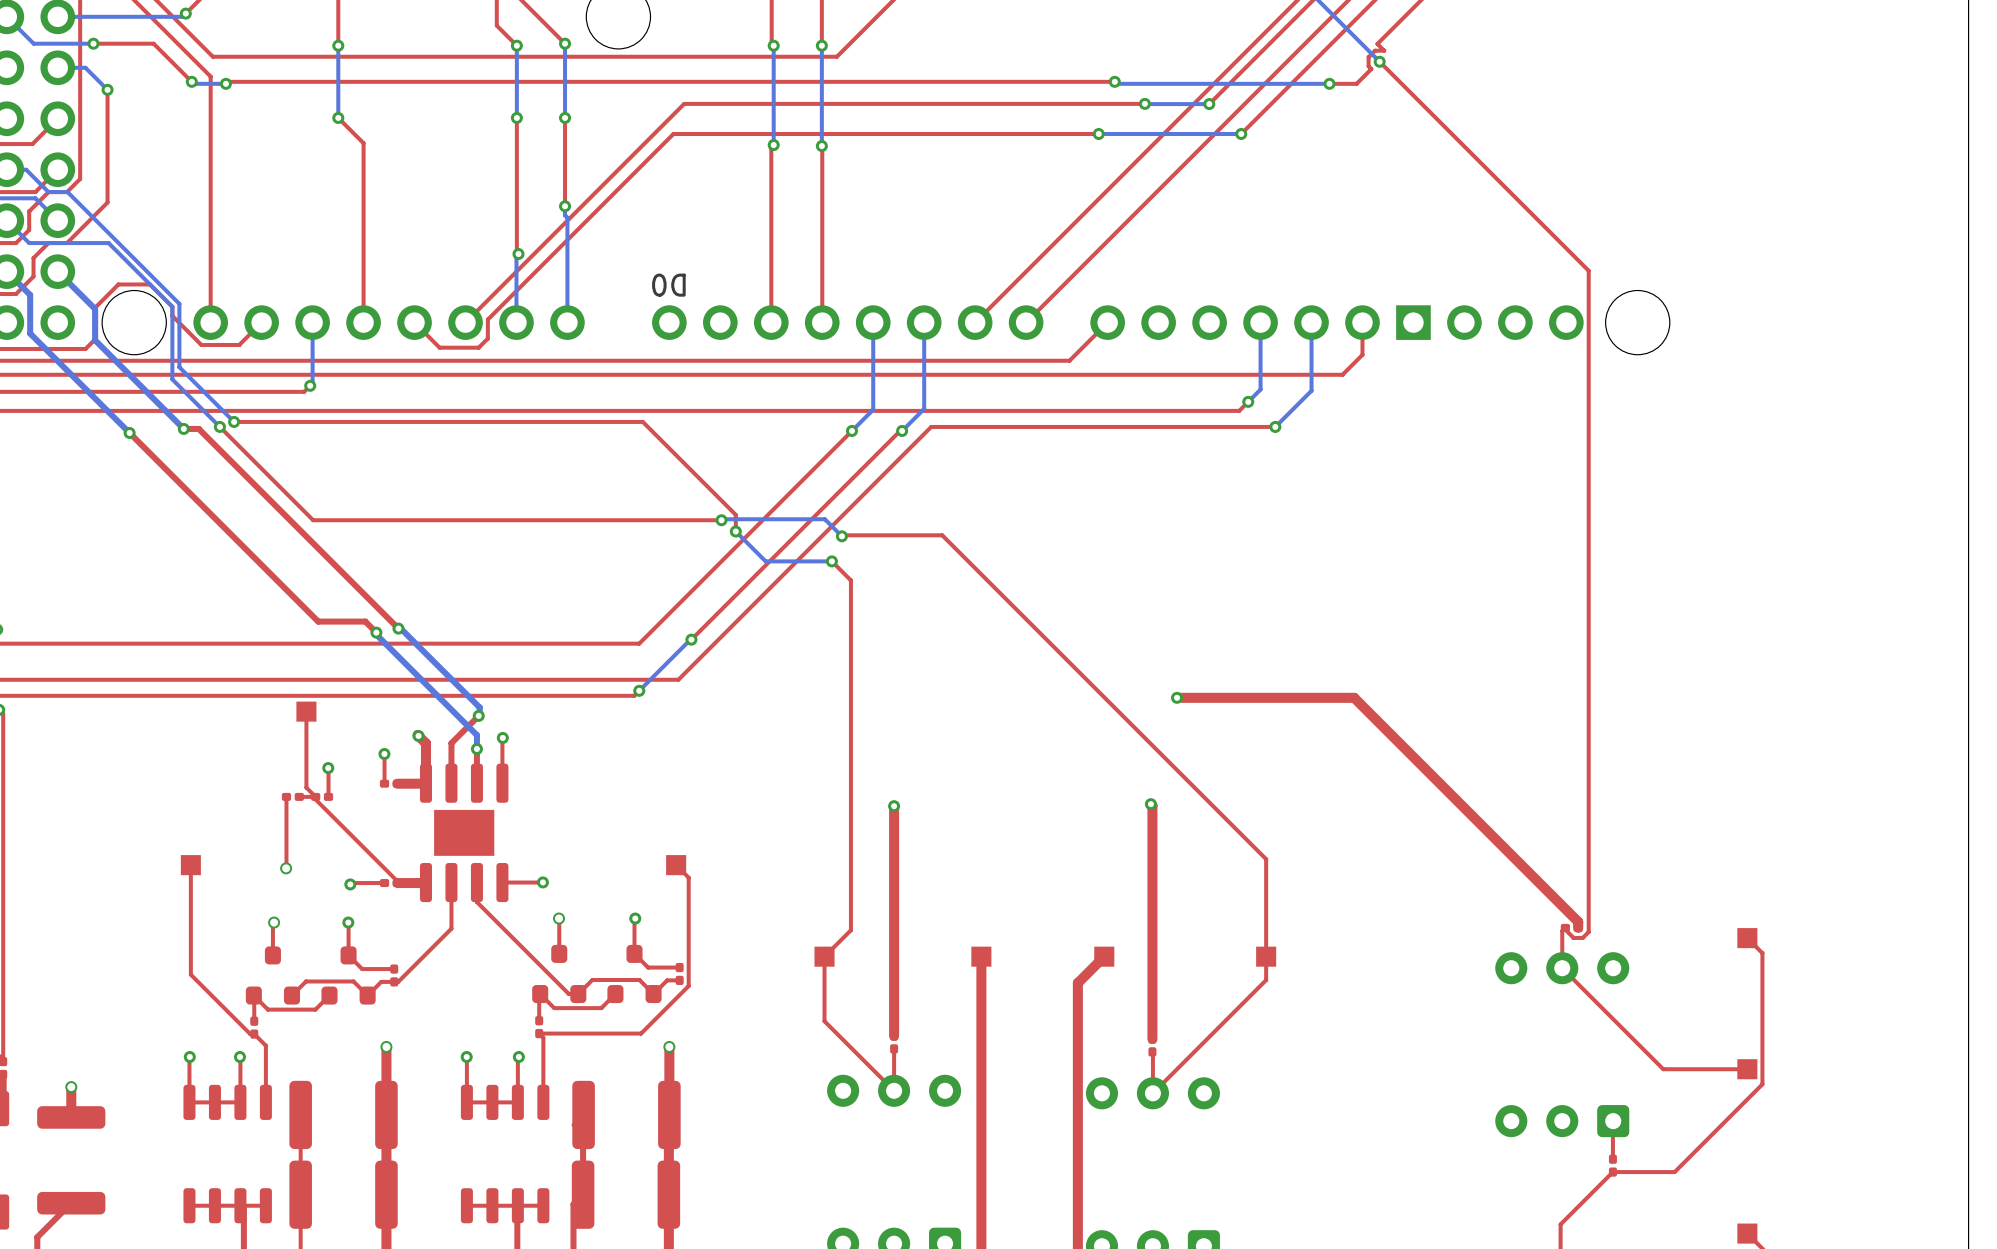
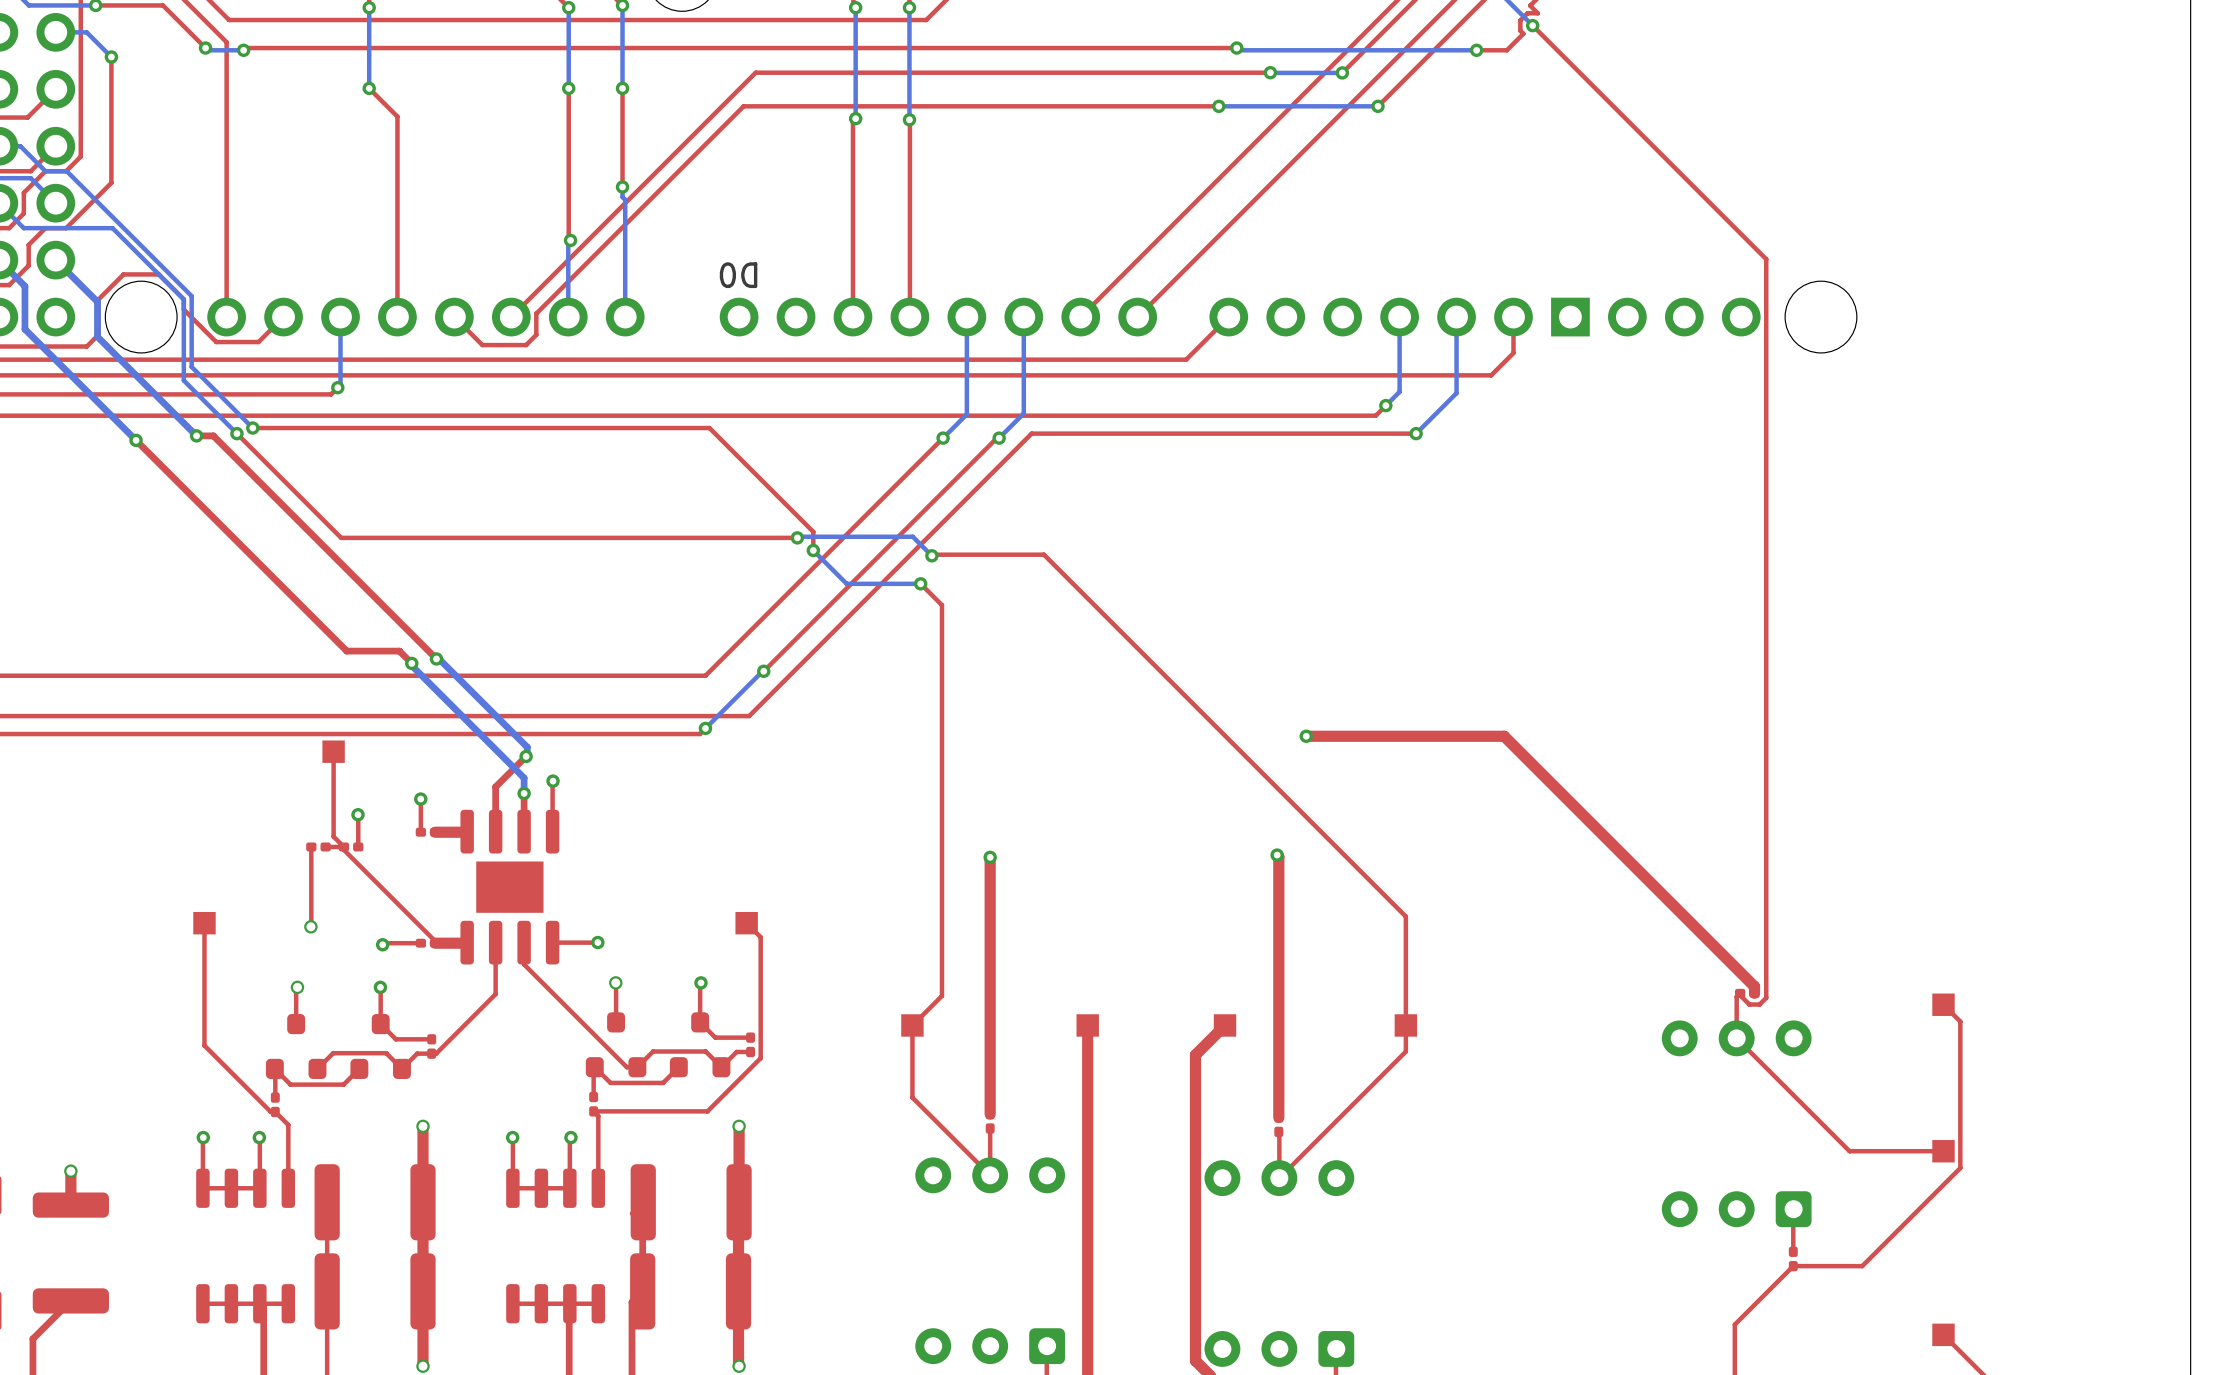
top track: (417, 734) (425, 743) (425, 783) -> none
via: (418, 735) -> none

